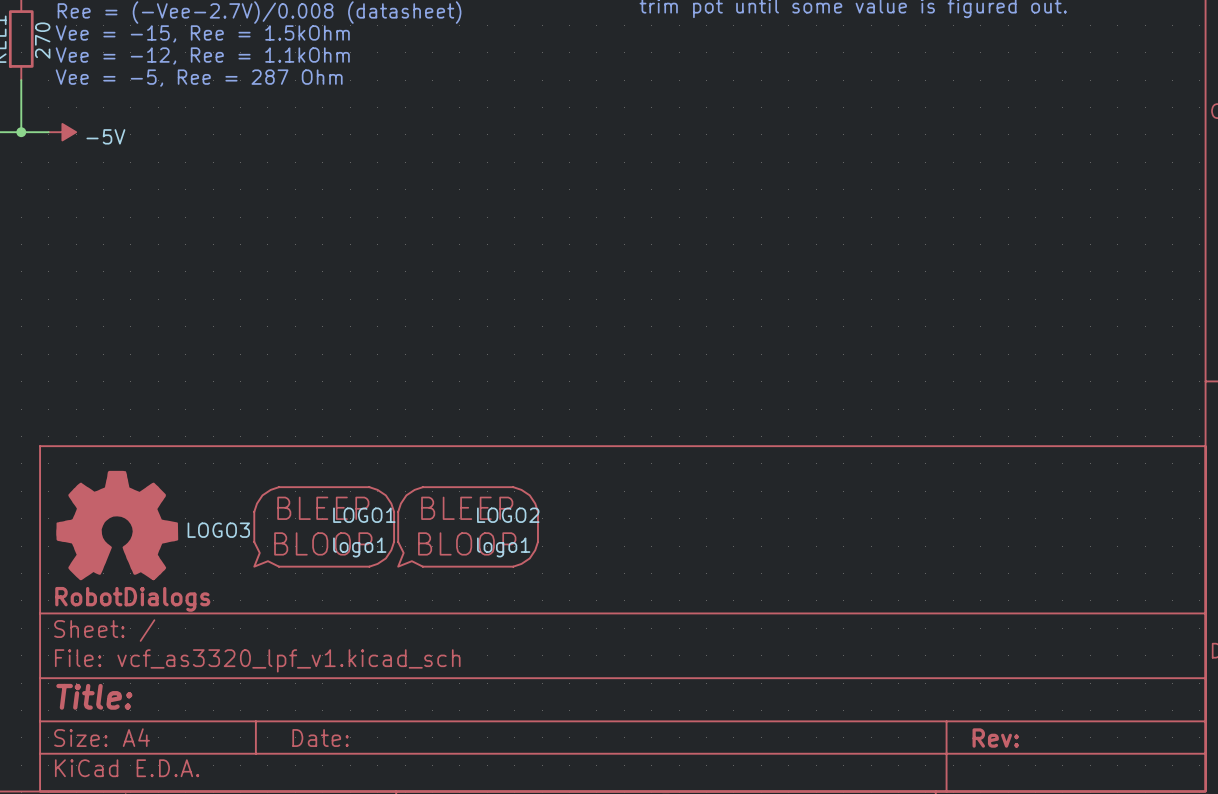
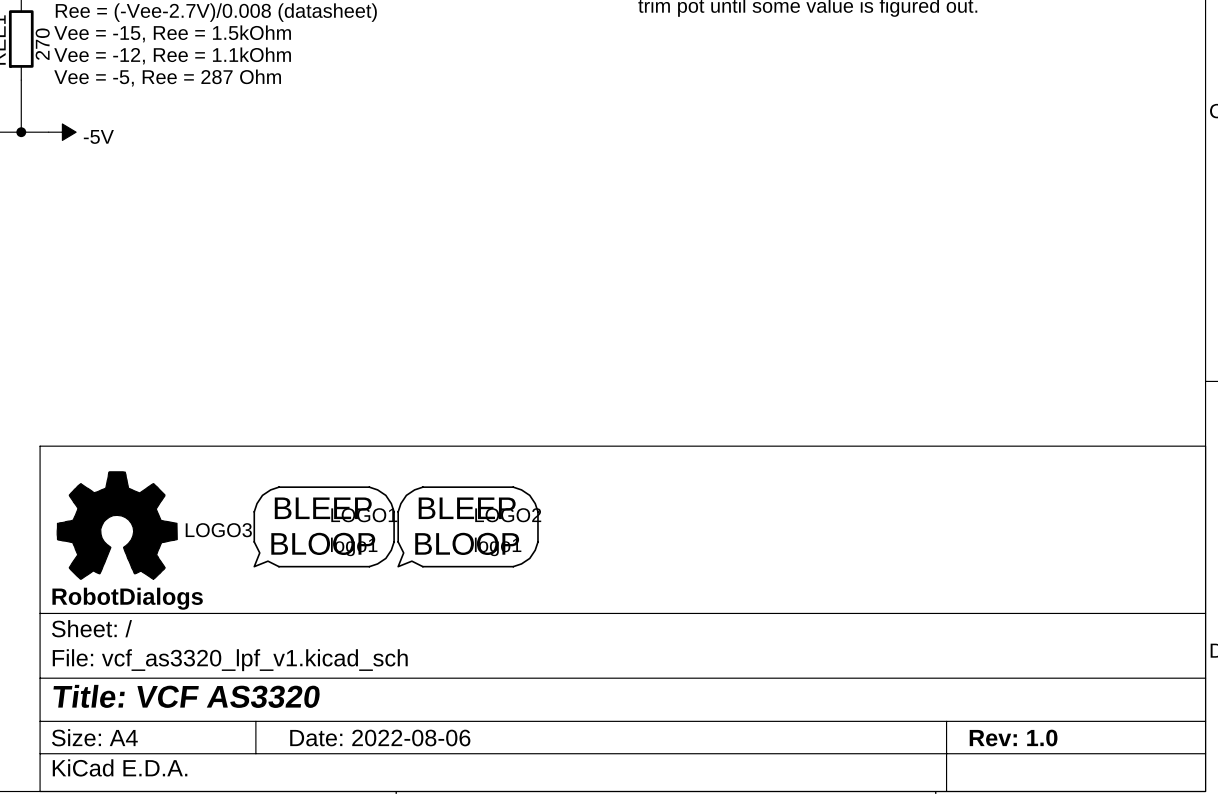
title block: Title: (94, 696) -> Title: VCF AS3320 (186, 696)
title block: Date: (320, 738) -> Date: 2022-08-06 (380, 738)
title block: Rev: (995, 738) -> Rev: 1.0 (1013, 738)

